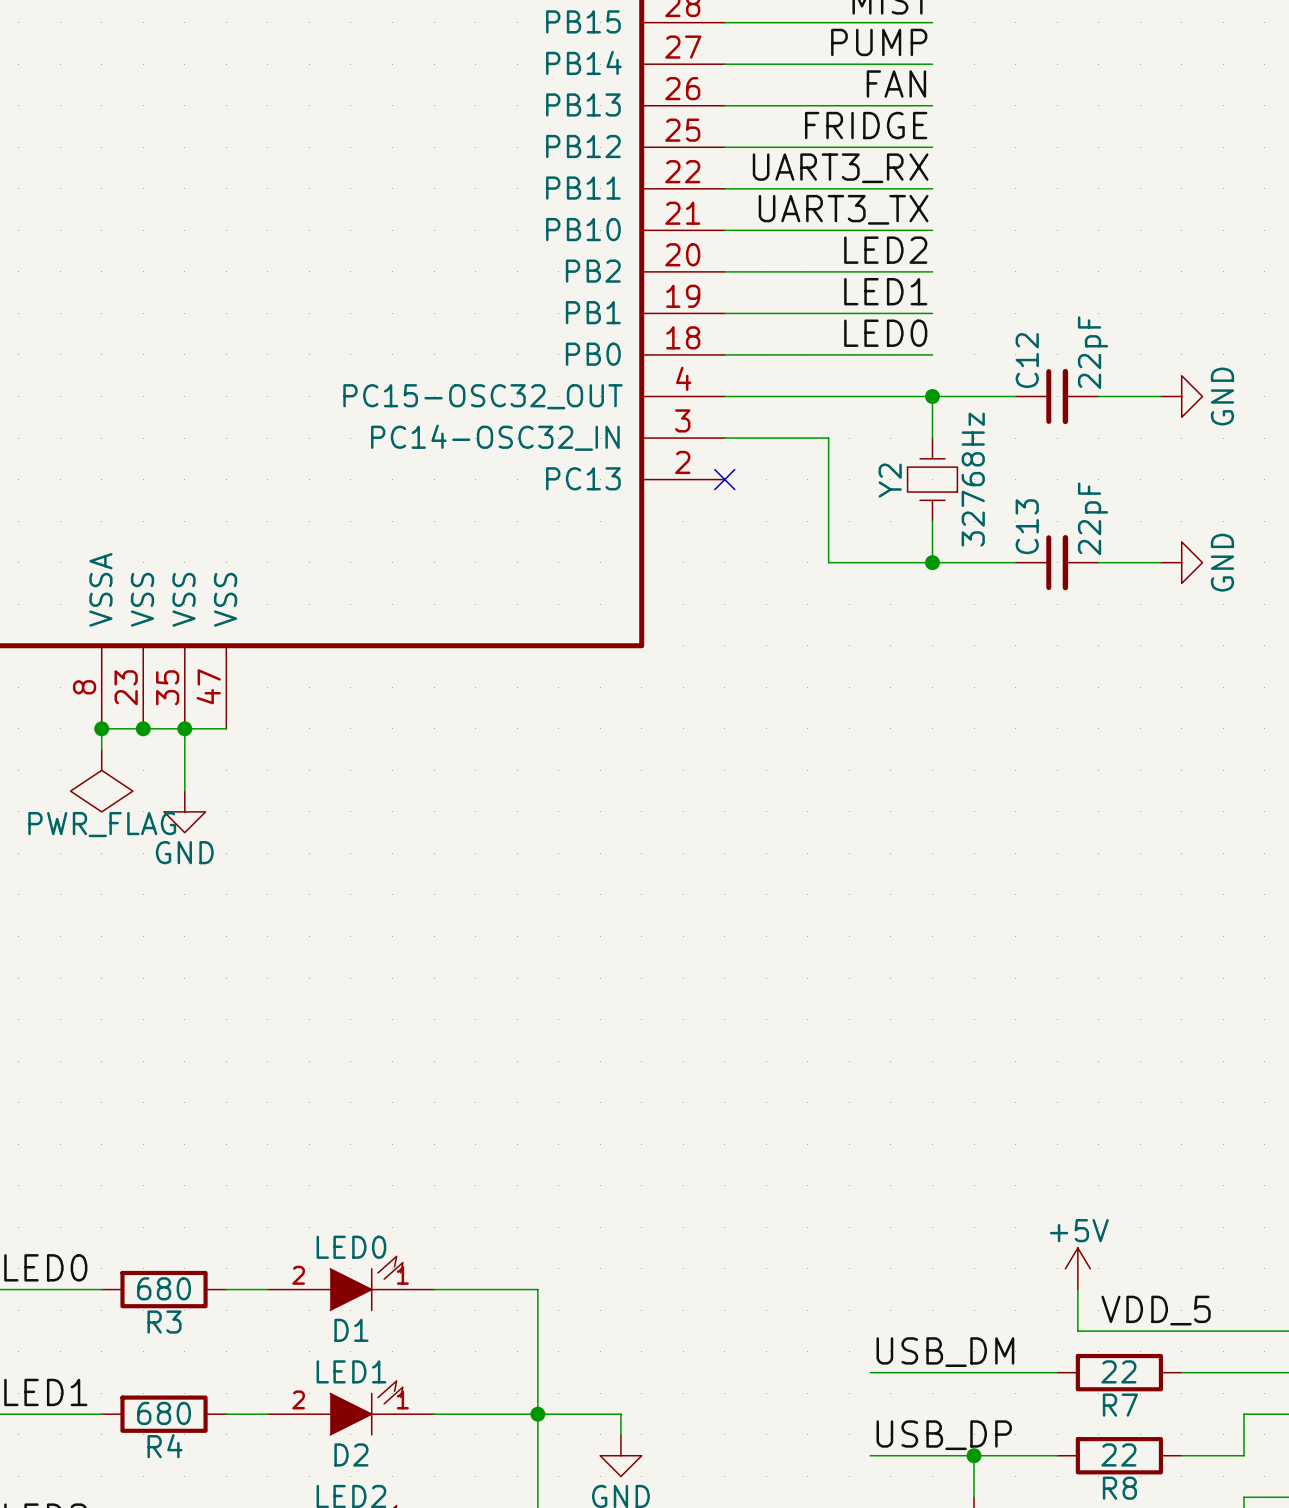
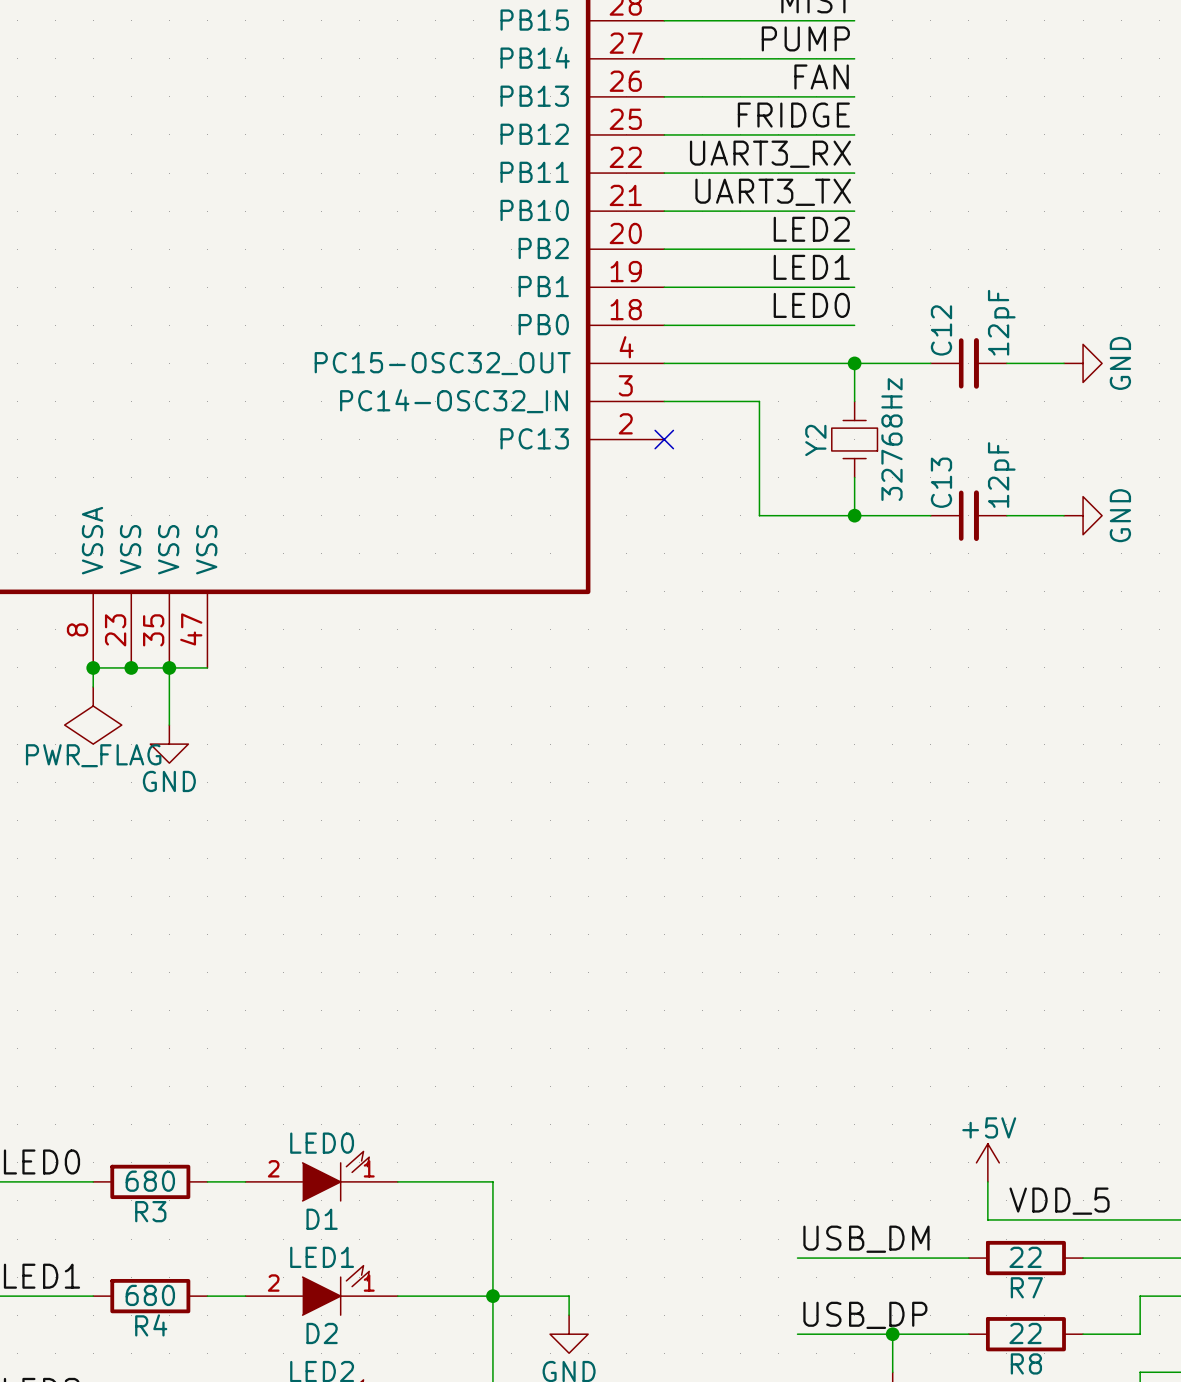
C12 value: 22pF (1093, 352) -> 12pF (1001, 322)
C13 value: 22pF (1093, 518) -> 12pF (1001, 475)

